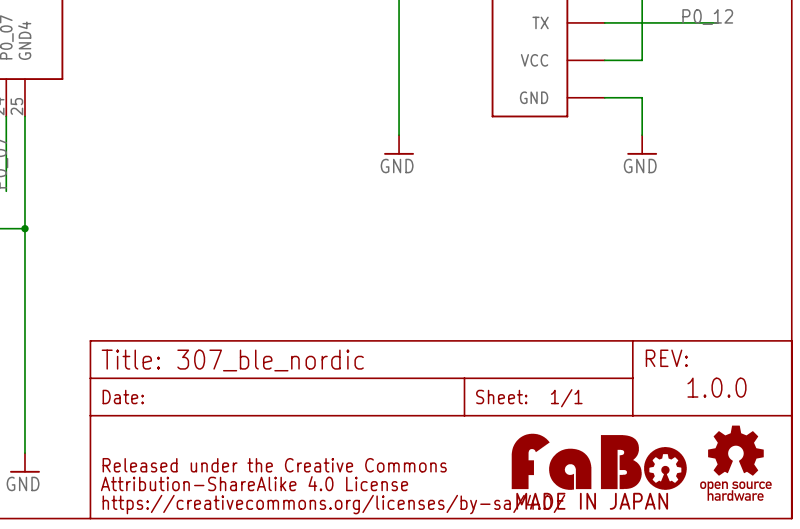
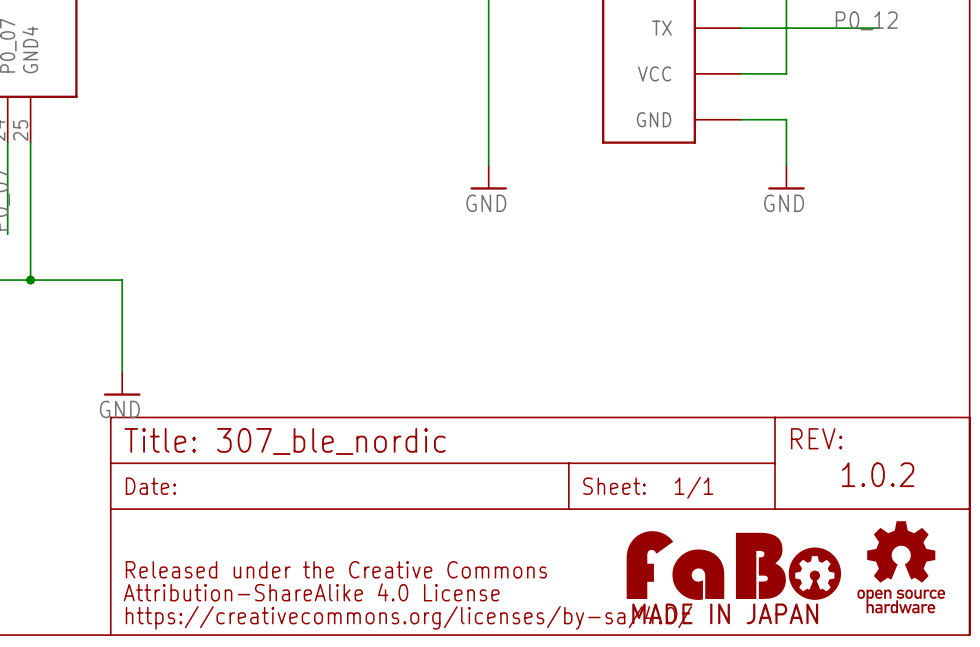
wire: (24, 228) (24, 453) -> (30, 280) (122, 280) (122, 371)
text: 1.0.0 (716, 387) -> 1.0.2 (878, 474)
power symbol position: GND (24, 462) -> GND (122, 383)

